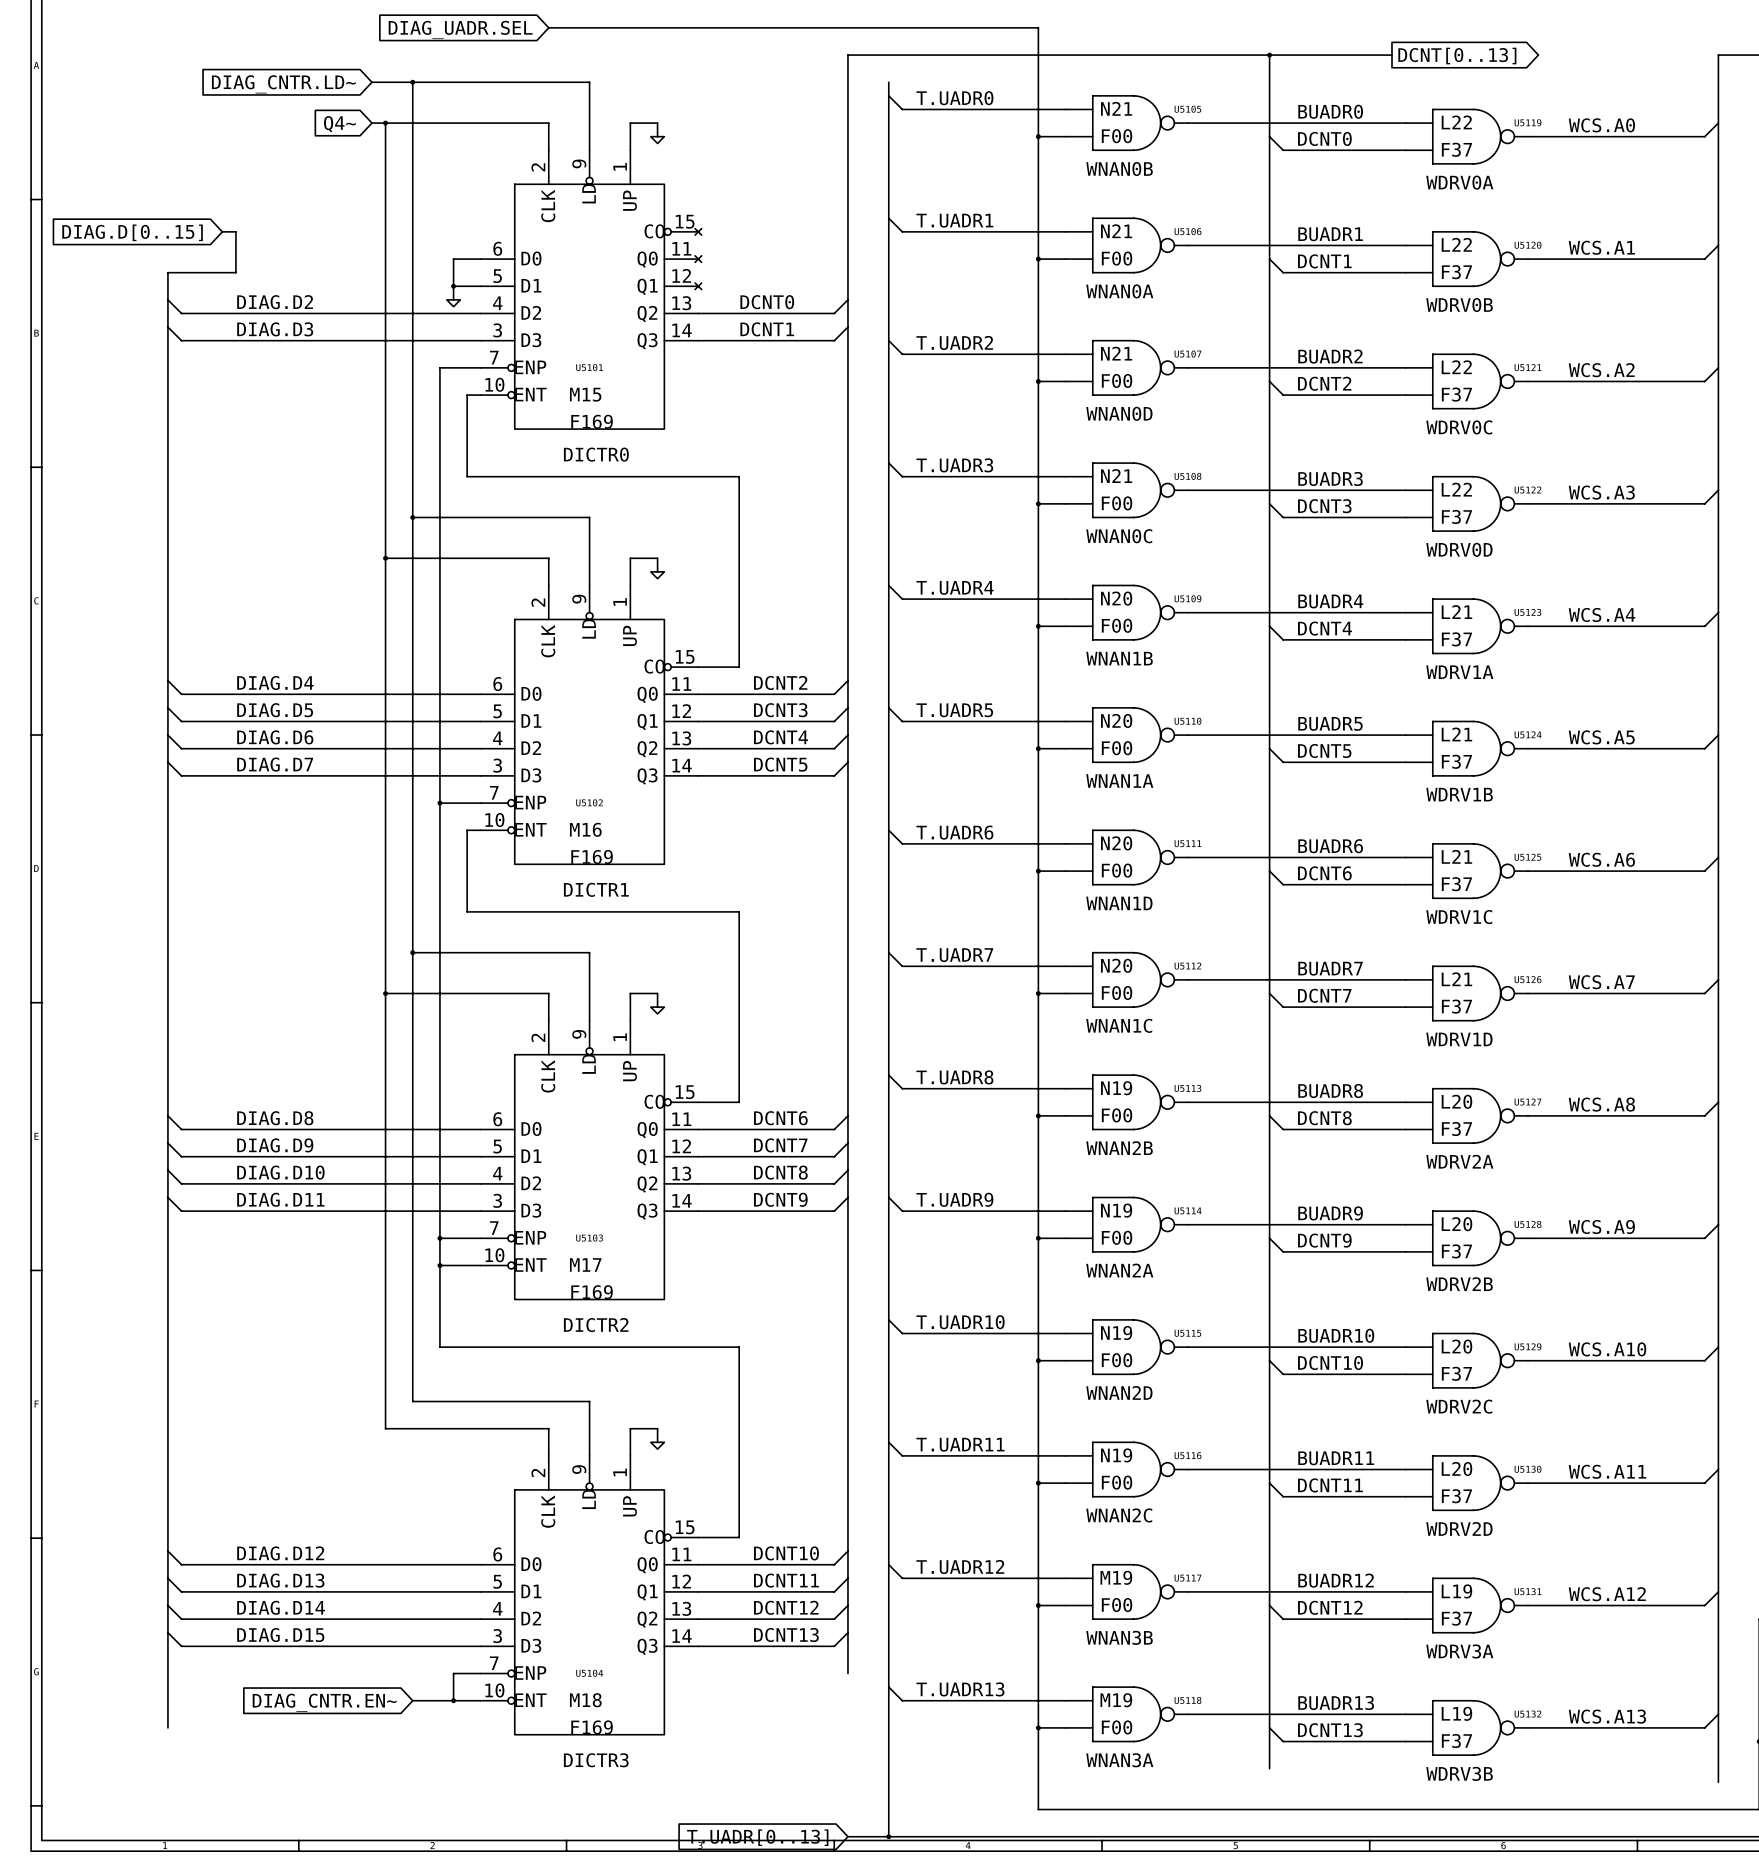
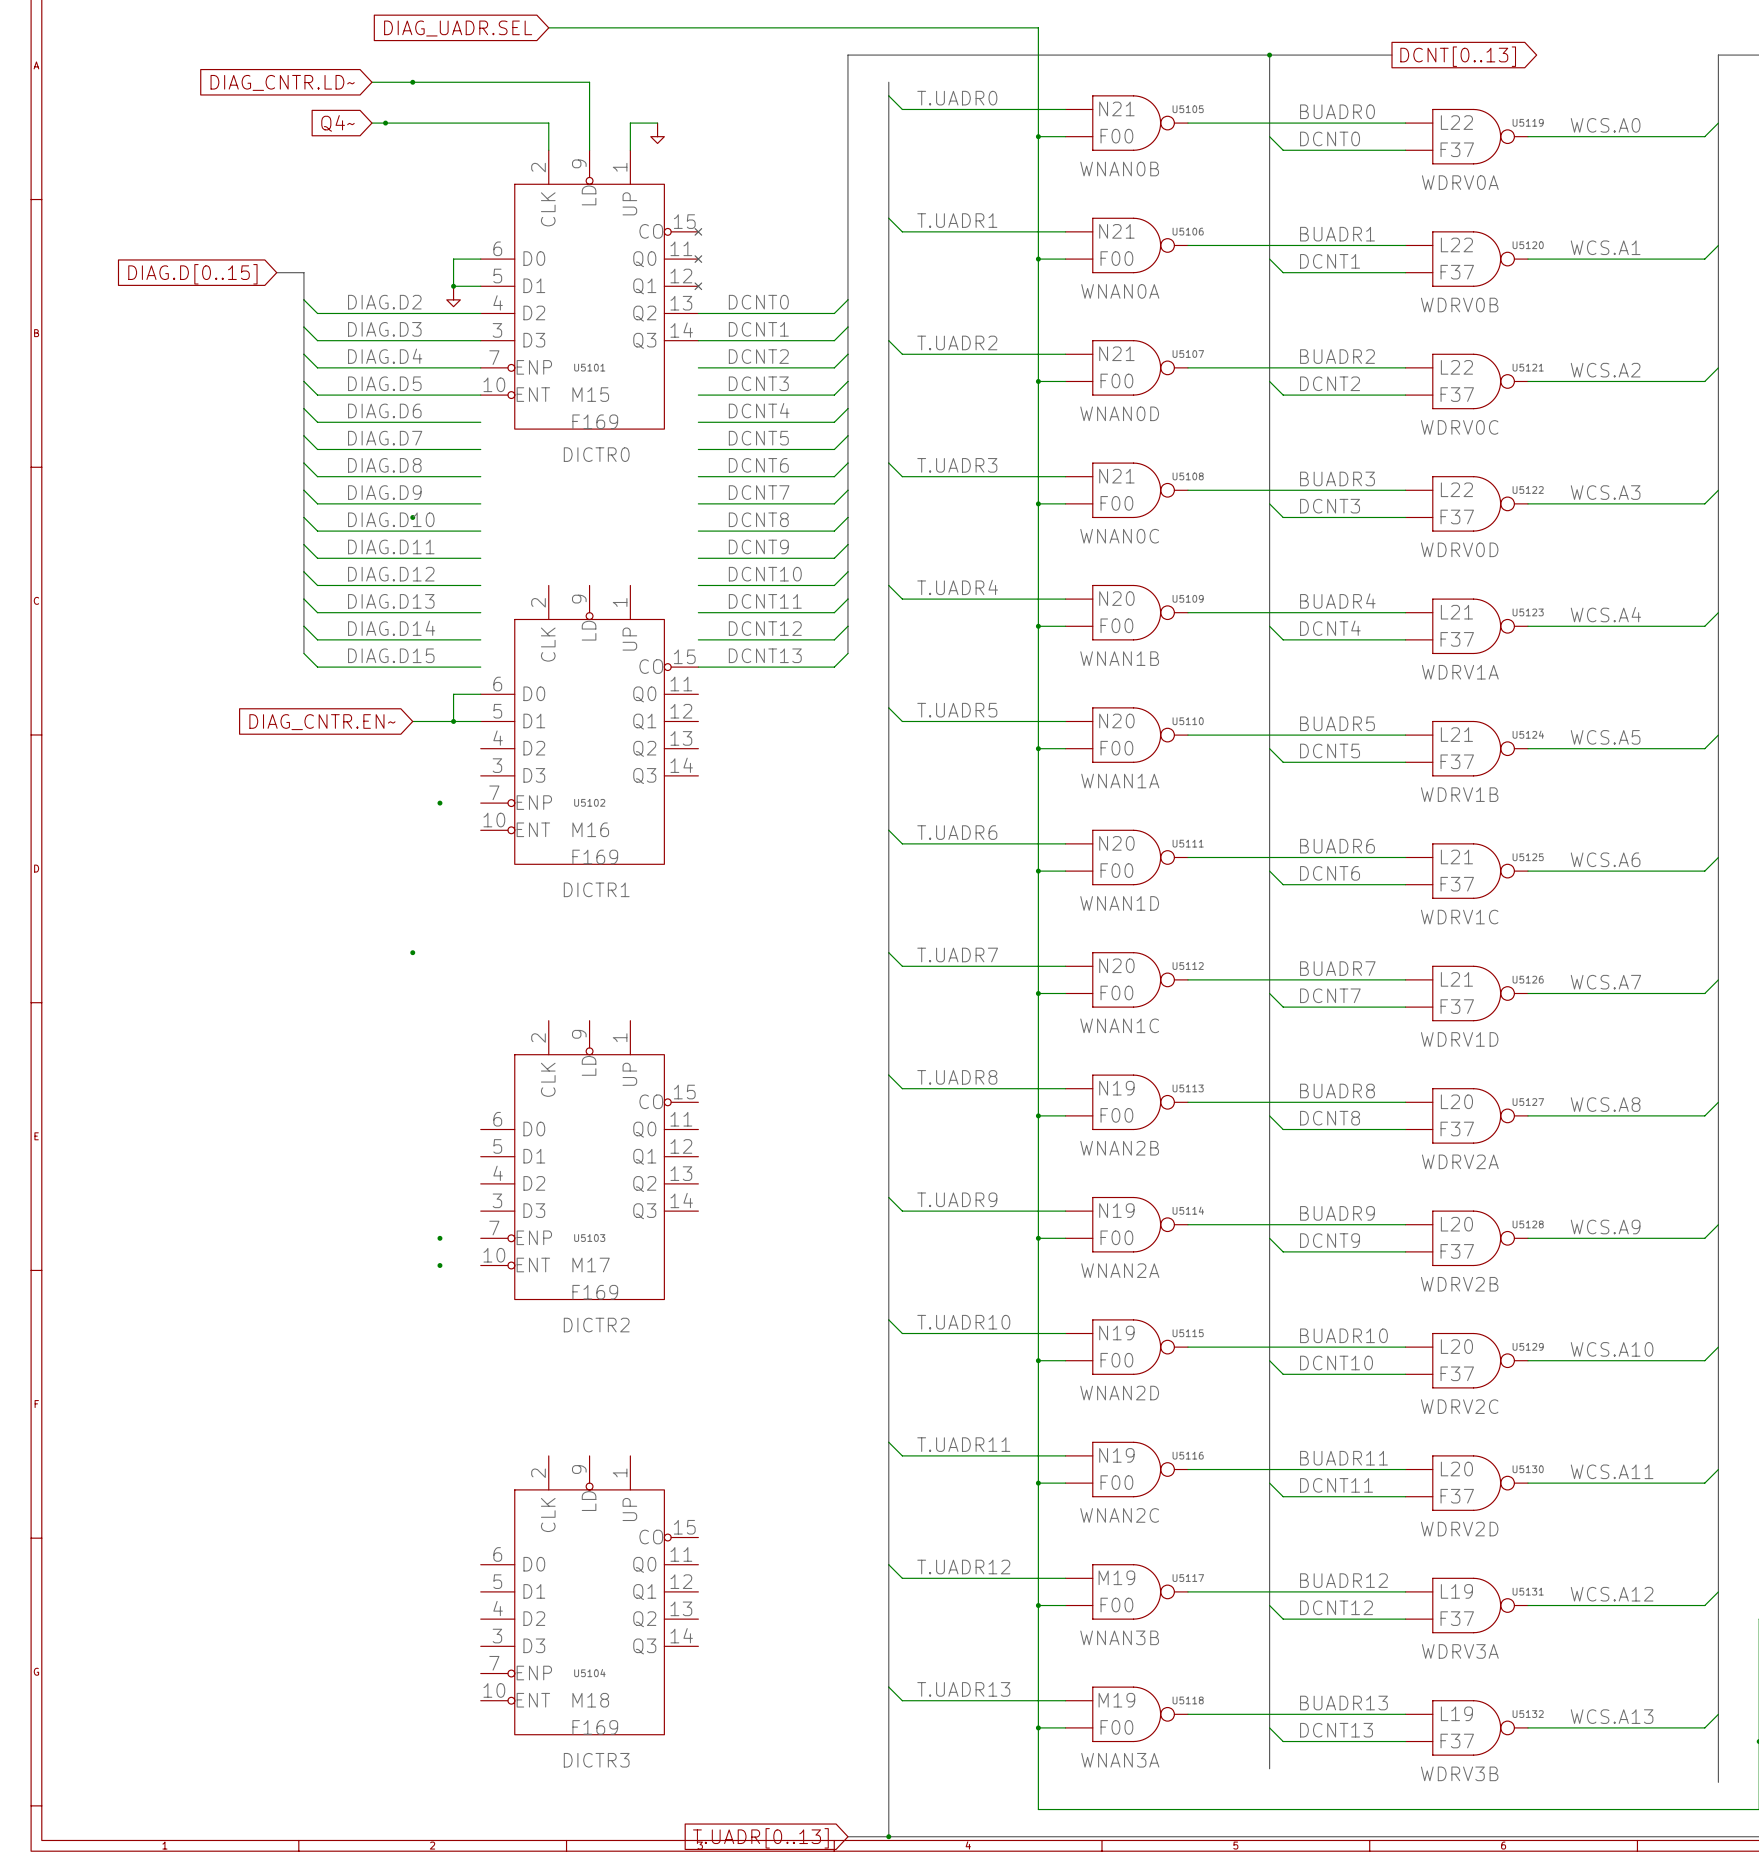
wire: (412, 82) (412, 1401) (589, 1401) (589, 1455) -> none
wire: (385, 123) (385, 1428) (548, 1428) (548, 1455) -> none
bus: (222, 231) (235, 231) (235, 272) (167, 272) (167, 1727) -> none
global label position: DIAG.D[0..15] (132, 232) -> DIAG.D[0..15] (192, 274)
bus: none -> (276, 272) (303, 272) (303, 653)
wire: (167, 299) (181, 313) (317, 313) -> (303, 299) (317, 313)
label position: DIAG.D2 (275, 302) -> DIAG.D2 (384, 302)
label position: DCNT0 (767, 302) -> DCNT0 (758, 302)
wire: (167, 327) (181, 340) (317, 340) -> (303, 327) (317, 340)
label position: DIAG.D3 (275, 329) -> DIAG.D3 (384, 329)
label position: DCNT1 (767, 329) -> DCNT1 (758, 329)
wire: none -> (847, 354) (834, 367) (698, 367)
label: none -> DIAG.D4 (385, 356)
label: none -> DCNT2 (758, 356)
wire: (439, 367) (439, 1347) (739, 1347) (739, 1537) (698, 1537) -> (439, 367) (317, 367) (303, 354)
wire: none -> (303, 381) (317, 395) (467, 395)
wire: none -> (847, 381) (834, 395) (698, 395)
label: none -> DIAG.D5 (384, 383)
label: none -> DCNT3 (758, 383)
wire: (467, 395) (467, 476) -> (303, 463) (317, 476) (467, 476)
wire: none -> (303, 408) (317, 422) (480, 422)
wire: none -> (847, 408) (834, 422) (698, 422)
label: none -> DIAG.D6 (384, 410)
label: none -> DCNT4 (759, 410)
wire: none -> (303, 435) (317, 449) (480, 449)
wire: none -> (847, 435) (834, 449) (698, 449)
label: none -> DIAG.D7 (385, 438)
label: none -> DCNT5 (758, 438)
wire: none -> (847, 463) (834, 476) (739, 476)
label: none -> DIAG.D8 (384, 465)
label: none -> DCNT6 (758, 465)
wire: (480, 476) (698, 476) -> none
wire: (739, 476) (739, 667) -> (847, 653) (834, 667) (739, 667)
wire: none -> (303, 490) (317, 503) (480, 503)
wire: none -> (847, 490) (834, 503) (698, 503)
label: none -> DIAG.D9 (384, 492)
label: none -> DCNT7 (759, 492)
wire: none -> (303, 517) (317, 531) (480, 531)
wire: (412, 517) (589, 517) (589, 585) -> none
wire: none -> (847, 517) (834, 531) (698, 531)
label: none -> DIAG.D10 (391, 519)
label: none -> DCNT8 (758, 519)
wire: none -> (303, 544) (317, 558) (385, 558)
wire: none -> (847, 544) (834, 558) (698, 558)
label: none -> DIAG.D11 (391, 546)
label: none -> DCNT9 (758, 546)
junction: (385, 558) -> none
wire: (480, 558) (548, 558) (548, 585) -> none
wire: (657, 558) (630, 558) (630, 585) -> none
power symbol: (657, 568) -> none
wire: none -> (303, 571) (317, 585) (480, 585)
label: none -> DIAG.D12 (391, 574)
label: none -> DCNT10 (765, 574)
wire: none -> (303, 599) (317, 612) (480, 612)
label: none -> DIAG.D13 (391, 601)
label: none -> DCNT11 (765, 601)
wire: none -> (303, 626) (317, 639) (480, 639)
label: none -> DIAG.D14 (391, 628)
label: none -> DCNT12 (765, 628)
wire: none -> (303, 653) (317, 667) (480, 667)
bus: (847, 653) (847, 1673) -> none
label: none -> DIAG.D15 (391, 655)
wire: (167, 680) (181, 694) (453, 694) -> (453, 721) (453, 694)
wire: (847, 680) (834, 694) (698, 694) -> (847, 571) (834, 585) (698, 585)
label: DIAG.D4 (275, 682) -> none
label: DCNT2 (780, 682) -> DCNT13 (765, 655)
wire: (167, 707) (181, 721) (412, 721) -> none
wire: (847, 707) (834, 721) (698, 721) -> (847, 599) (834, 612) (698, 612)
label: DIAG.D5 (275, 710) -> none
label: DCNT3 (780, 710) -> none
junction: none -> (453, 721)
global label: none -> DIAG_CNTR.EN~ (322, 722)
wire: (167, 735) (181, 748) (480, 748) -> none
wire: (847, 735) (834, 748) (698, 748) -> (847, 626) (834, 639) (698, 639)
label: DIAG.D6 (275, 737) -> none
label: DCNT4 (781, 737) -> none
wire: (167, 762) (181, 775) (480, 775) -> none
wire: (847, 762) (834, 775) (698, 775) -> none
label: DIAG.D7 (275, 764) -> none
label: DCNT5 (780, 764) -> none
wire: (439, 803) (480, 803) -> none
wire: (480, 830) (467, 830) (467, 911) (739, 911) (739, 1102) (698, 1102) -> none
wire: (412, 952) (589, 952) (589, 1020) -> none
wire: (385, 993) (548, 993) (548, 1020) -> none
junction: (385, 993) -> none
wire: (657, 993) (630, 993) (630, 1020) -> none
power symbol: (657, 1003) -> none
wire: (167, 1115) (181, 1129) (480, 1129) -> none
wire: (847, 1115) (834, 1129) (698, 1129) -> none
label: DIAG.D8 (275, 1118) -> none
label: DCNT6 (780, 1118) -> none
wire: (167, 1143) (181, 1156) (480, 1156) -> none
wire: (847, 1143) (834, 1156) (698, 1156) -> none
label: DIAG.D9 (275, 1145) -> none
label: DCNT7 (780, 1145) -> none
wire: (167, 1170) (181, 1183) (480, 1183) -> none
wire: (847, 1170) (834, 1183) (698, 1183) -> none
label: DIAG.D10 (280, 1172) -> none
label: DCNT8 (780, 1172) -> none
wire: (167, 1197) (181, 1211) (480, 1211) -> none
wire: (847, 1197) (834, 1211) (698, 1211) -> none
label: DIAG.D11 (280, 1199) -> none
label: DCNT9 (780, 1199) -> none
wire: (439, 1238) (480, 1238) -> none
wire: (439, 1265) (480, 1265) -> none
wire: (657, 1428) (630, 1428) (630, 1455) -> none
power symbol: (657, 1439) -> none
wire: (167, 1551) (181, 1564) (480, 1564) -> none
wire: (847, 1551) (834, 1564) (698, 1564) -> none
label: DIAG.D12 (280, 1553) -> none
label: DCNT10 (786, 1553) -> none
wire: (167, 1578) (181, 1591) (480, 1591) -> none
wire: (847, 1578) (834, 1591) (698, 1591) -> none
label: DIAG.D13 (280, 1580) -> none
label: DCNT11 (786, 1580) -> none
wire: (167, 1605) (181, 1619) (480, 1619) -> none
wire: (847, 1605) (834, 1619) (698, 1619) -> none
label: DIAG.D14 (281, 1607) -> none
label: DCNT12 (786, 1607) -> none
wire: (167, 1632) (181, 1646) (480, 1646) -> none
wire: (847, 1632) (834, 1646) (698, 1646) -> none
label: DIAG.D15 (280, 1635) -> none
label: DCNT13 (786, 1635) -> none
wire: (480, 1673) (453, 1673) (453, 1700) -> none
wire: (412, 1700) (480, 1700) -> none
junction: (453, 1700) -> none
global label: DIAG_CNTR.EN~ (324, 1702) -> none

